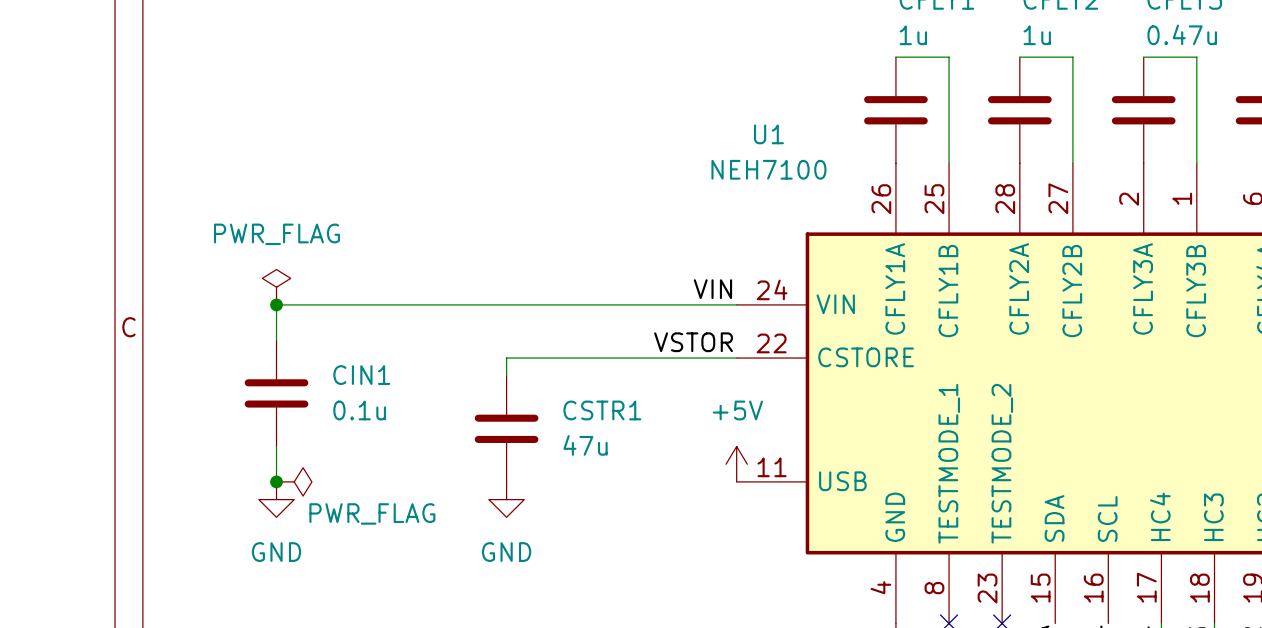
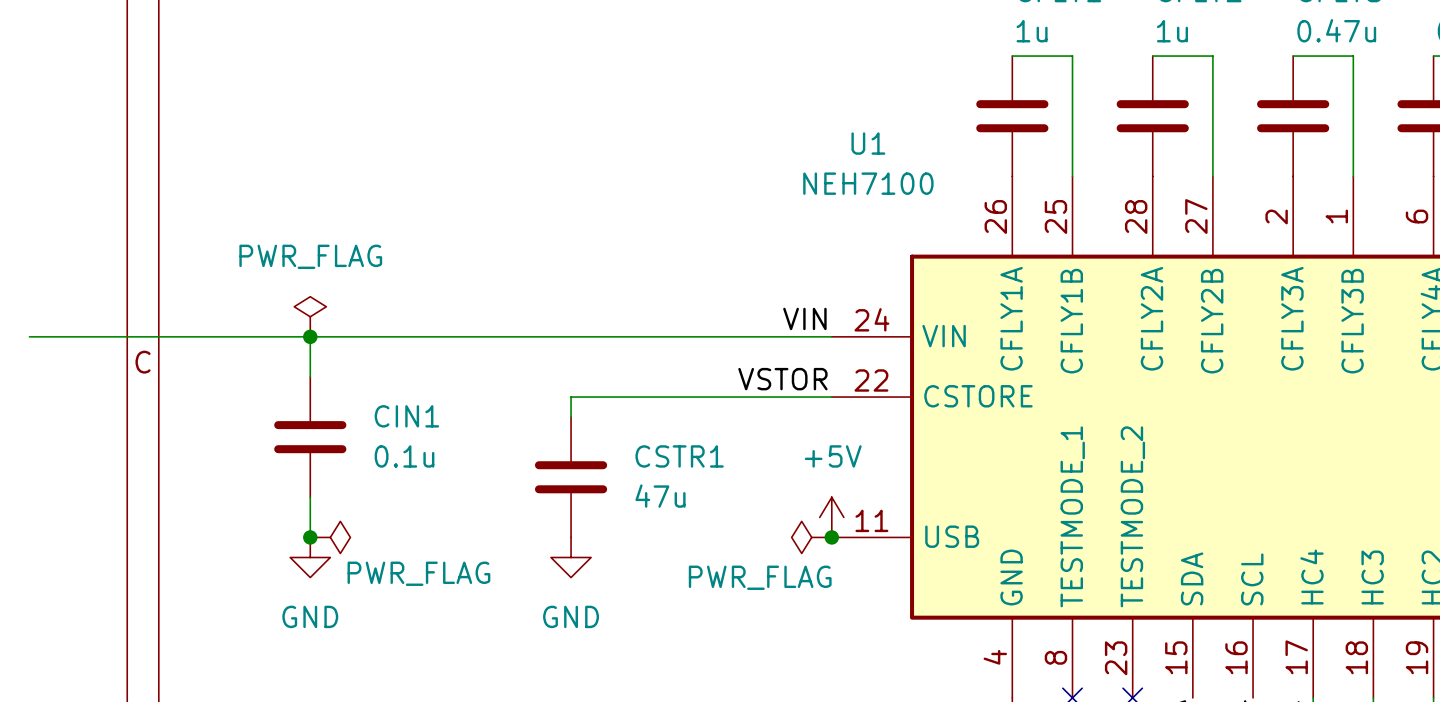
wire: none -> (29, 336) (310, 336)
power symbol: none -> PWR_FLAG (811, 537)
junction: none -> (831, 537)

